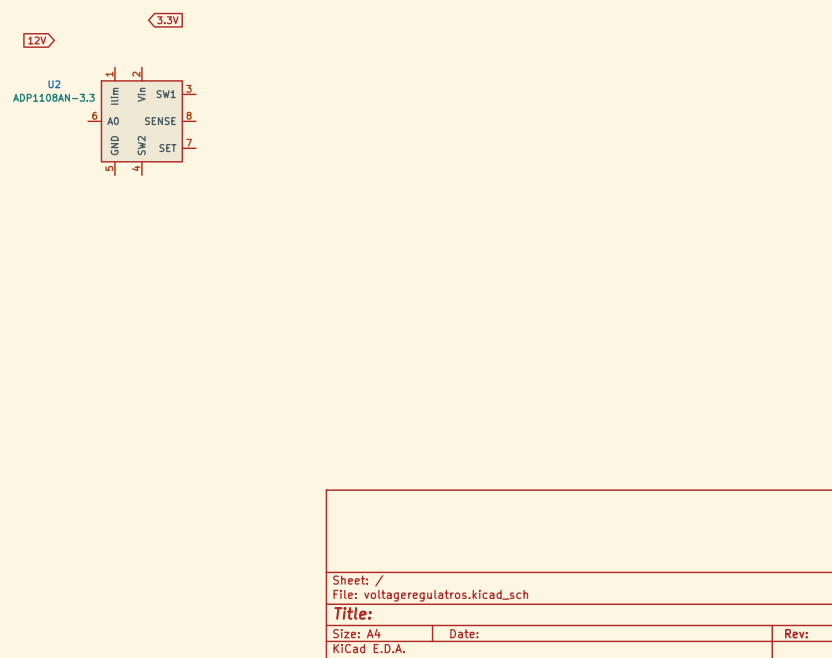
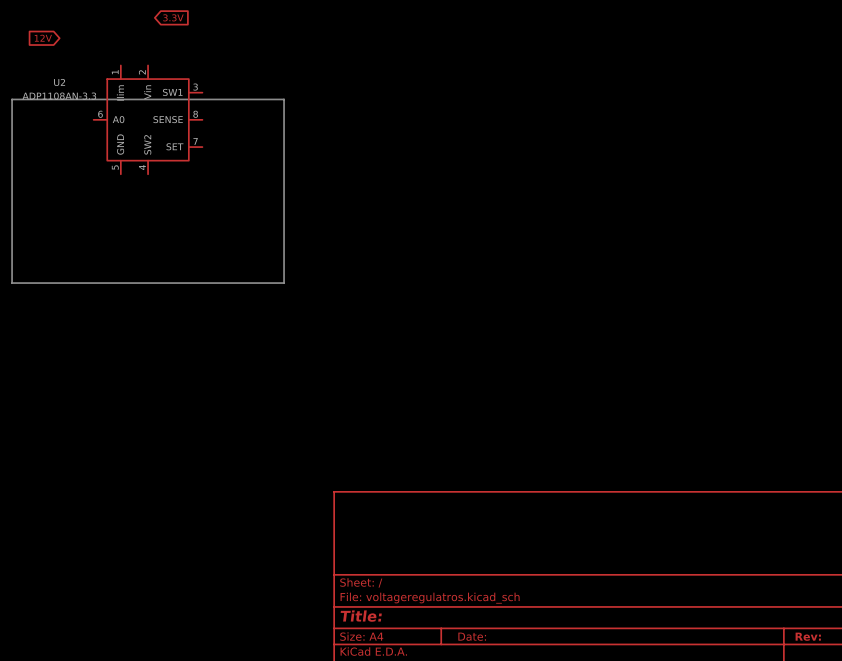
line: none -> (12, 99) (284, 99) (284, 283) (12, 283) (12, 99)

